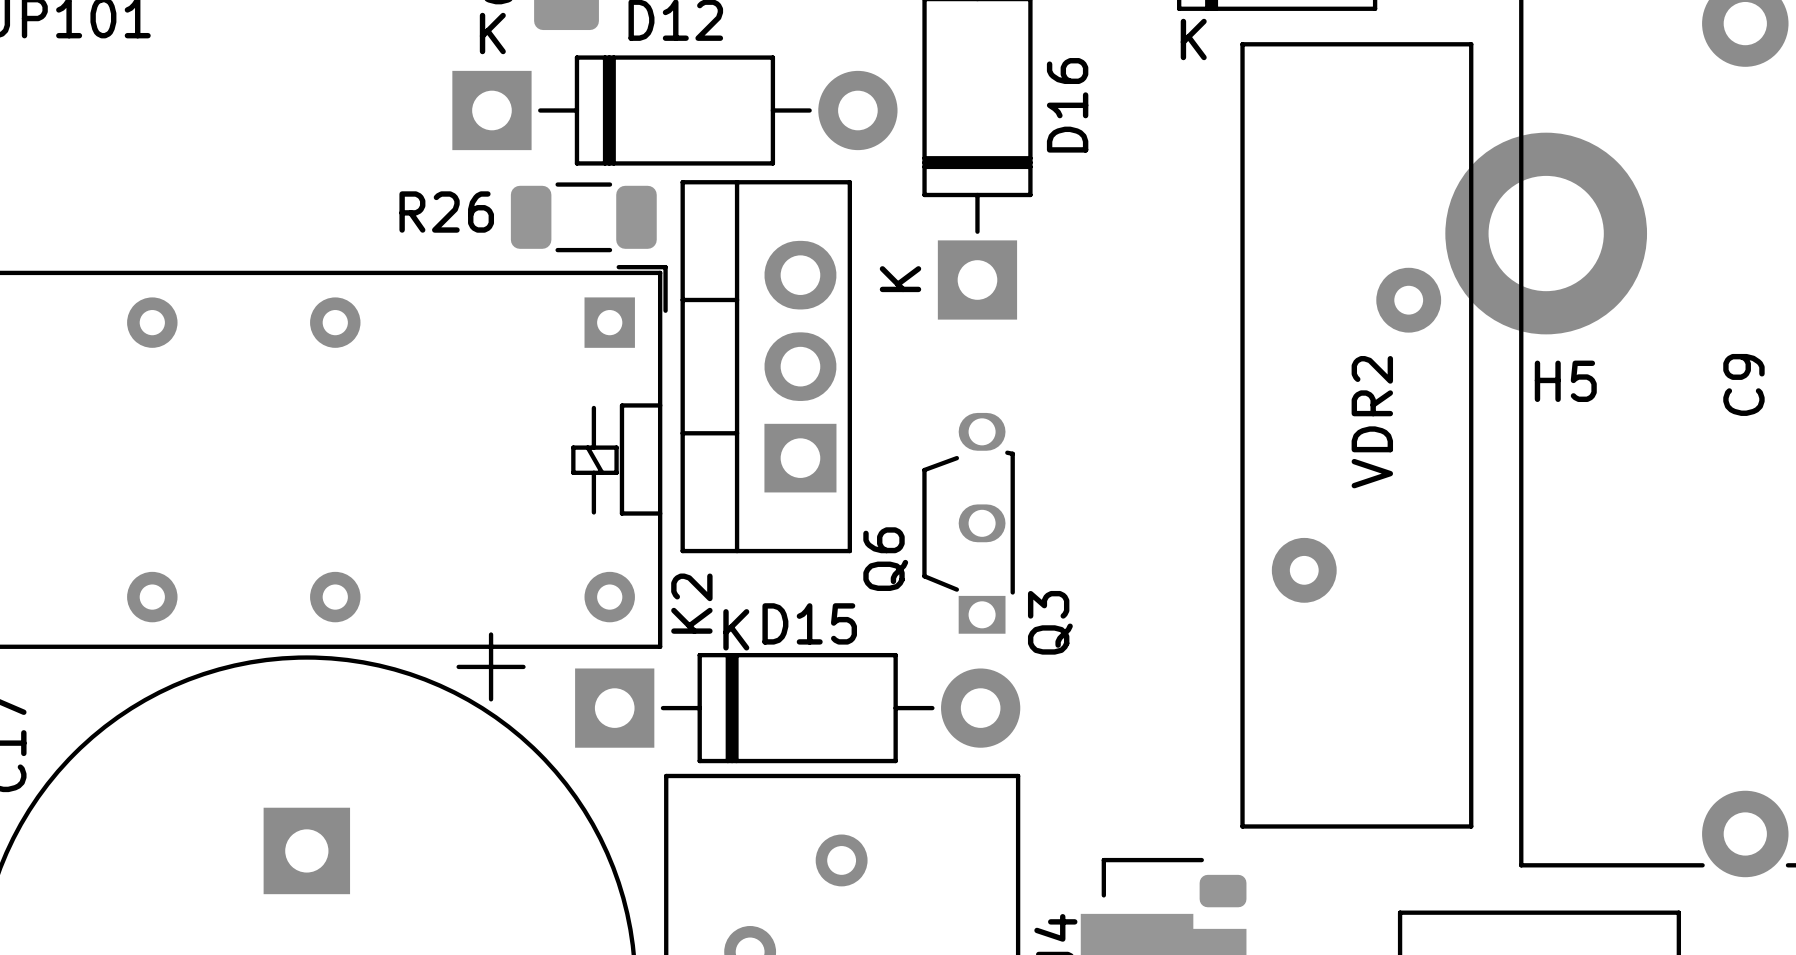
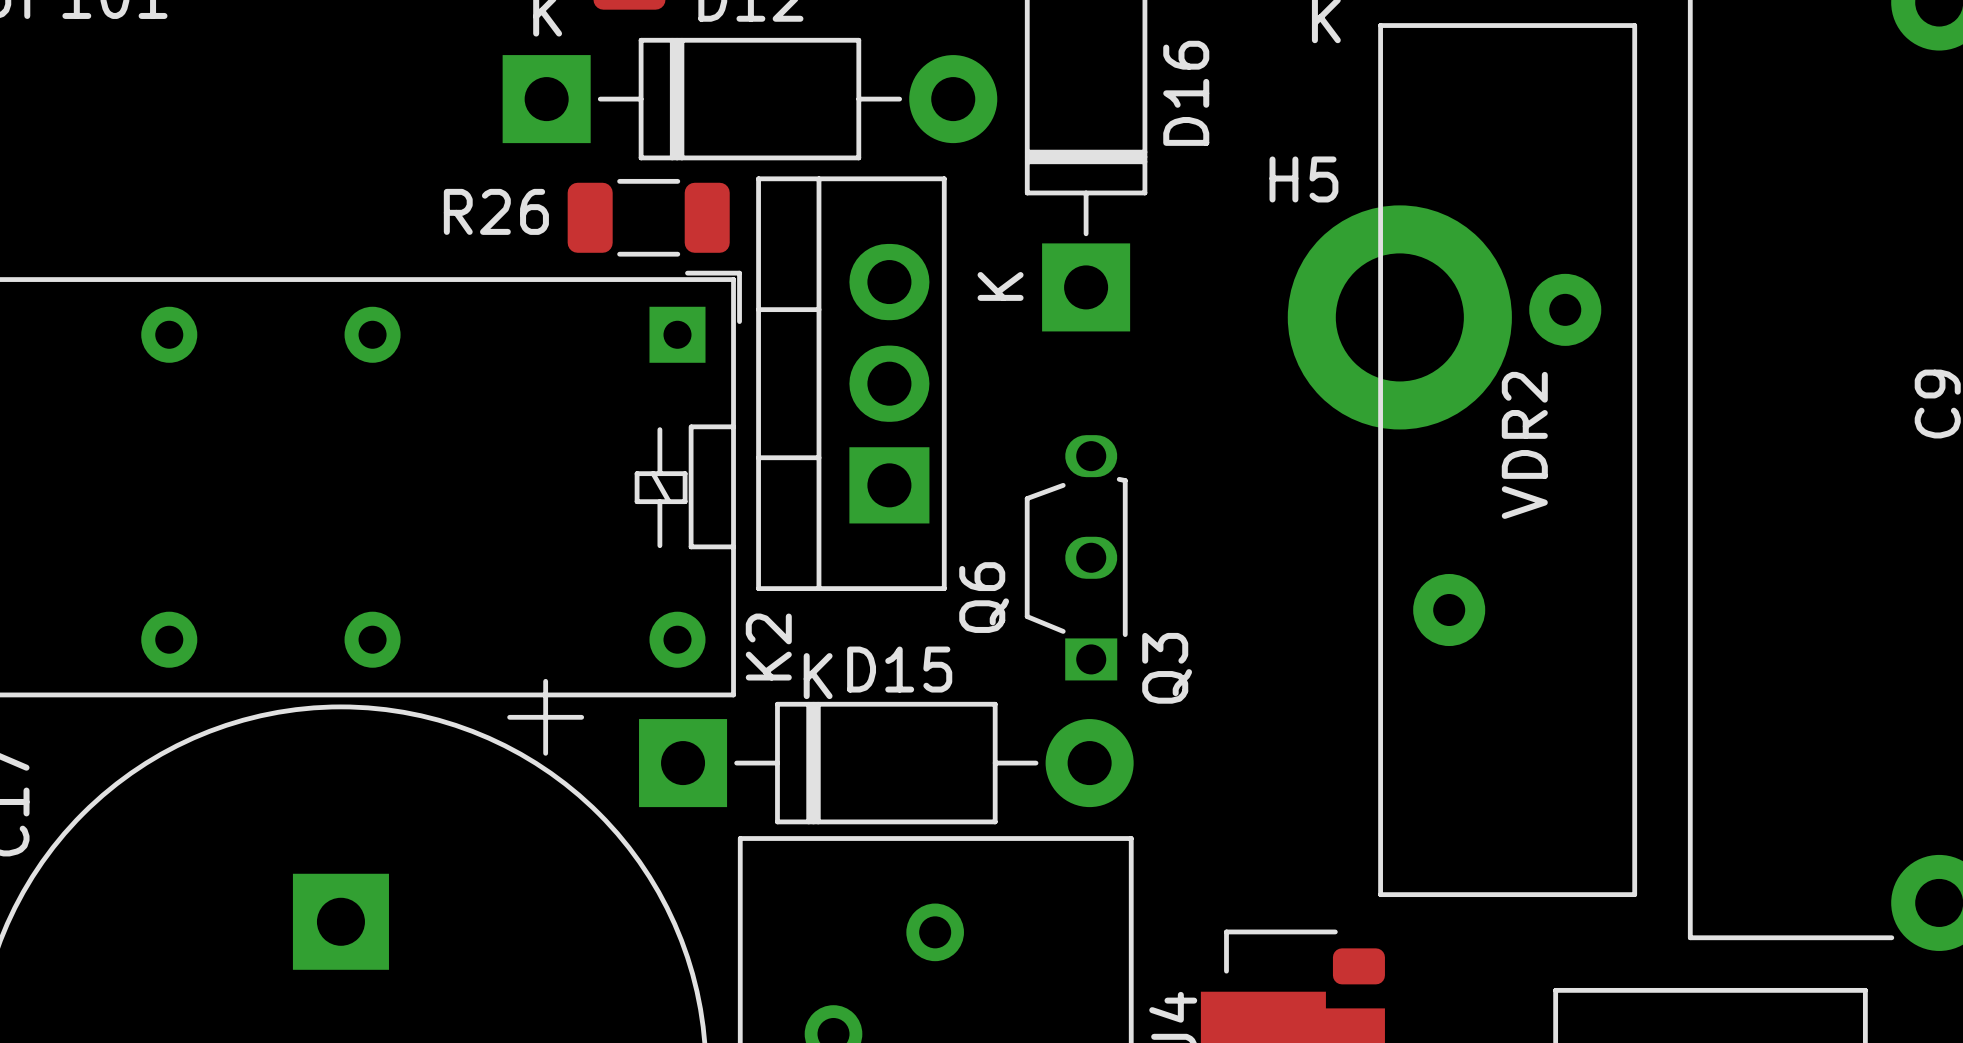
H5 position: (1546, 233) -> (1399, 317)
H5 name position: H5 (1565, 381) -> H5 (1303, 179)

